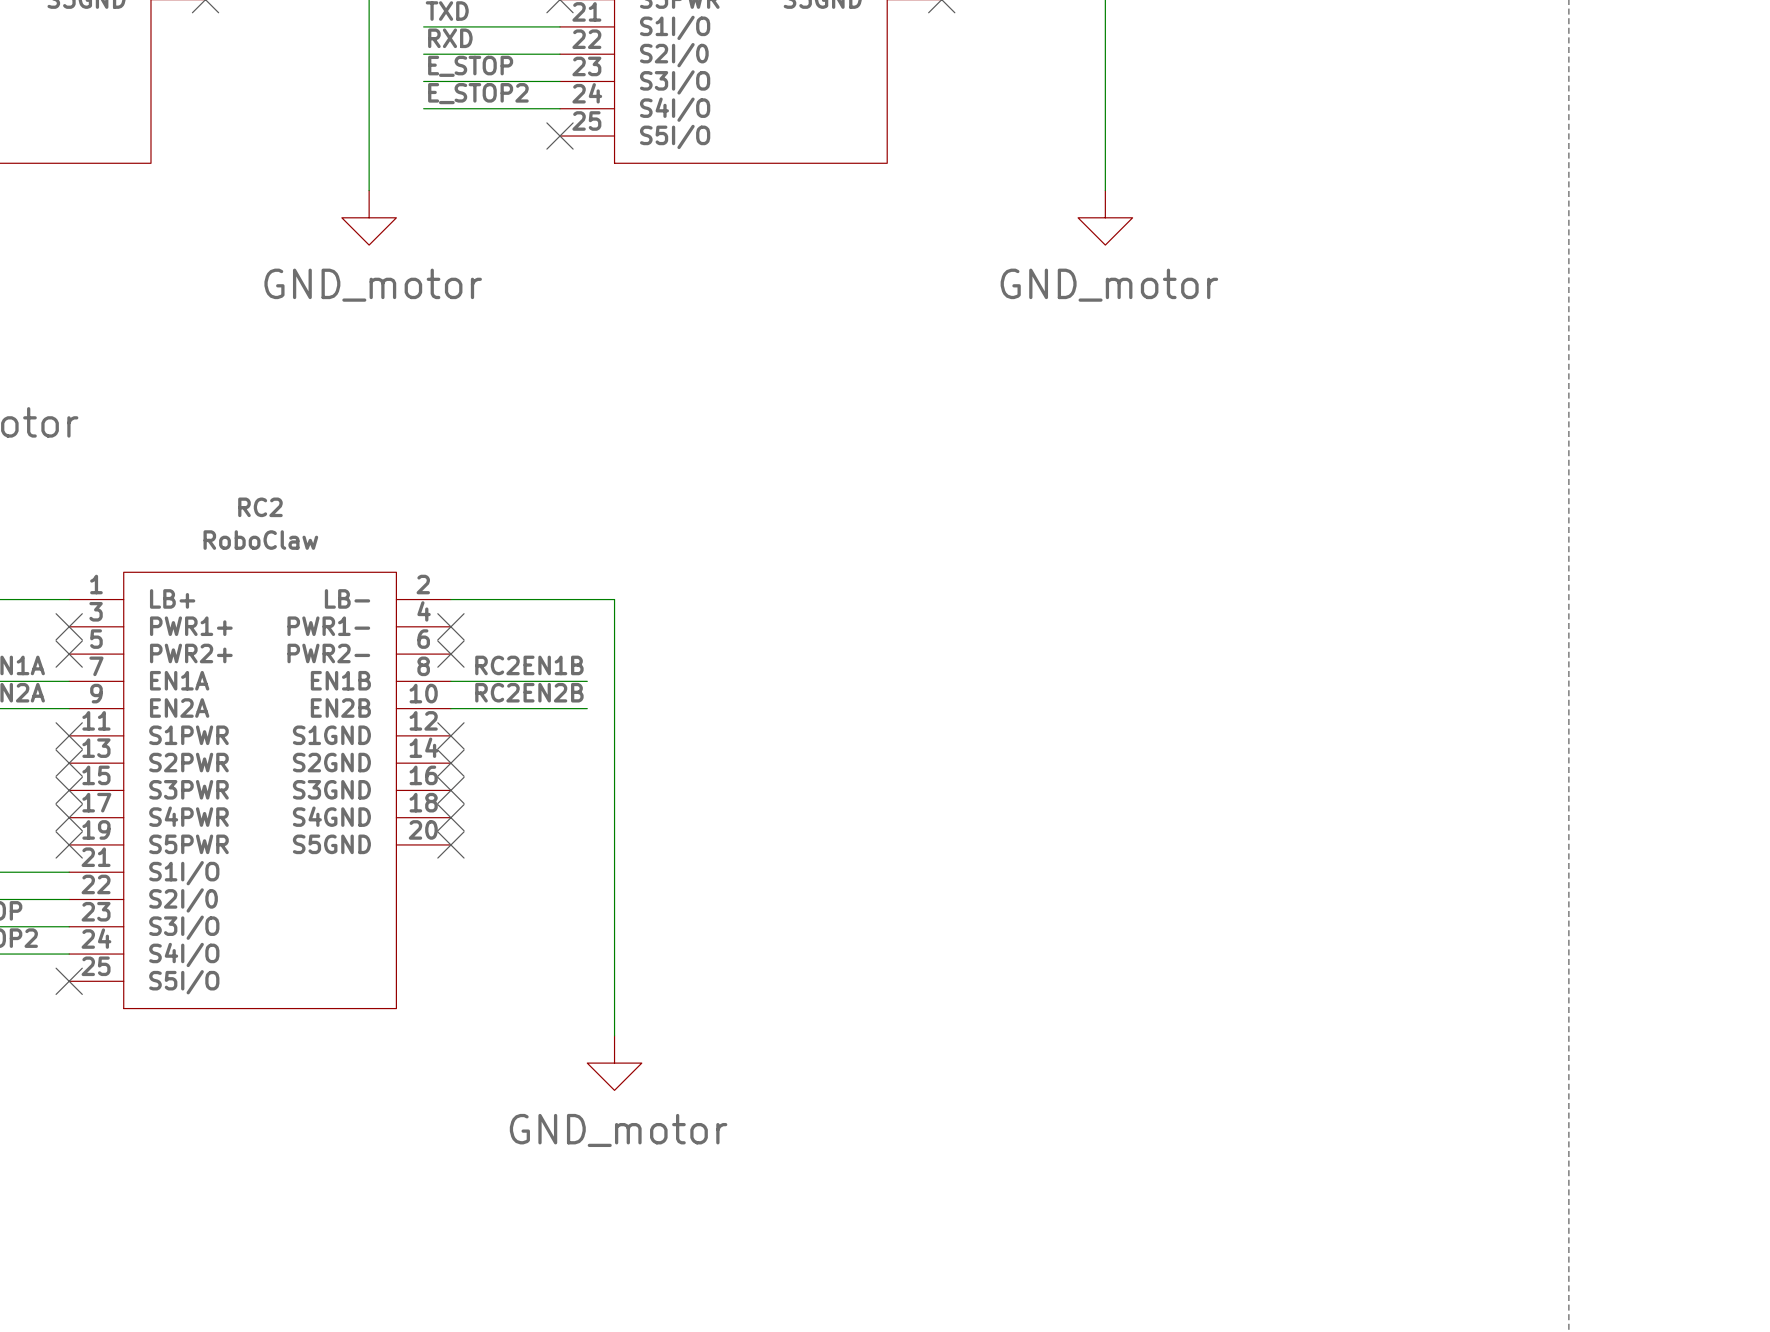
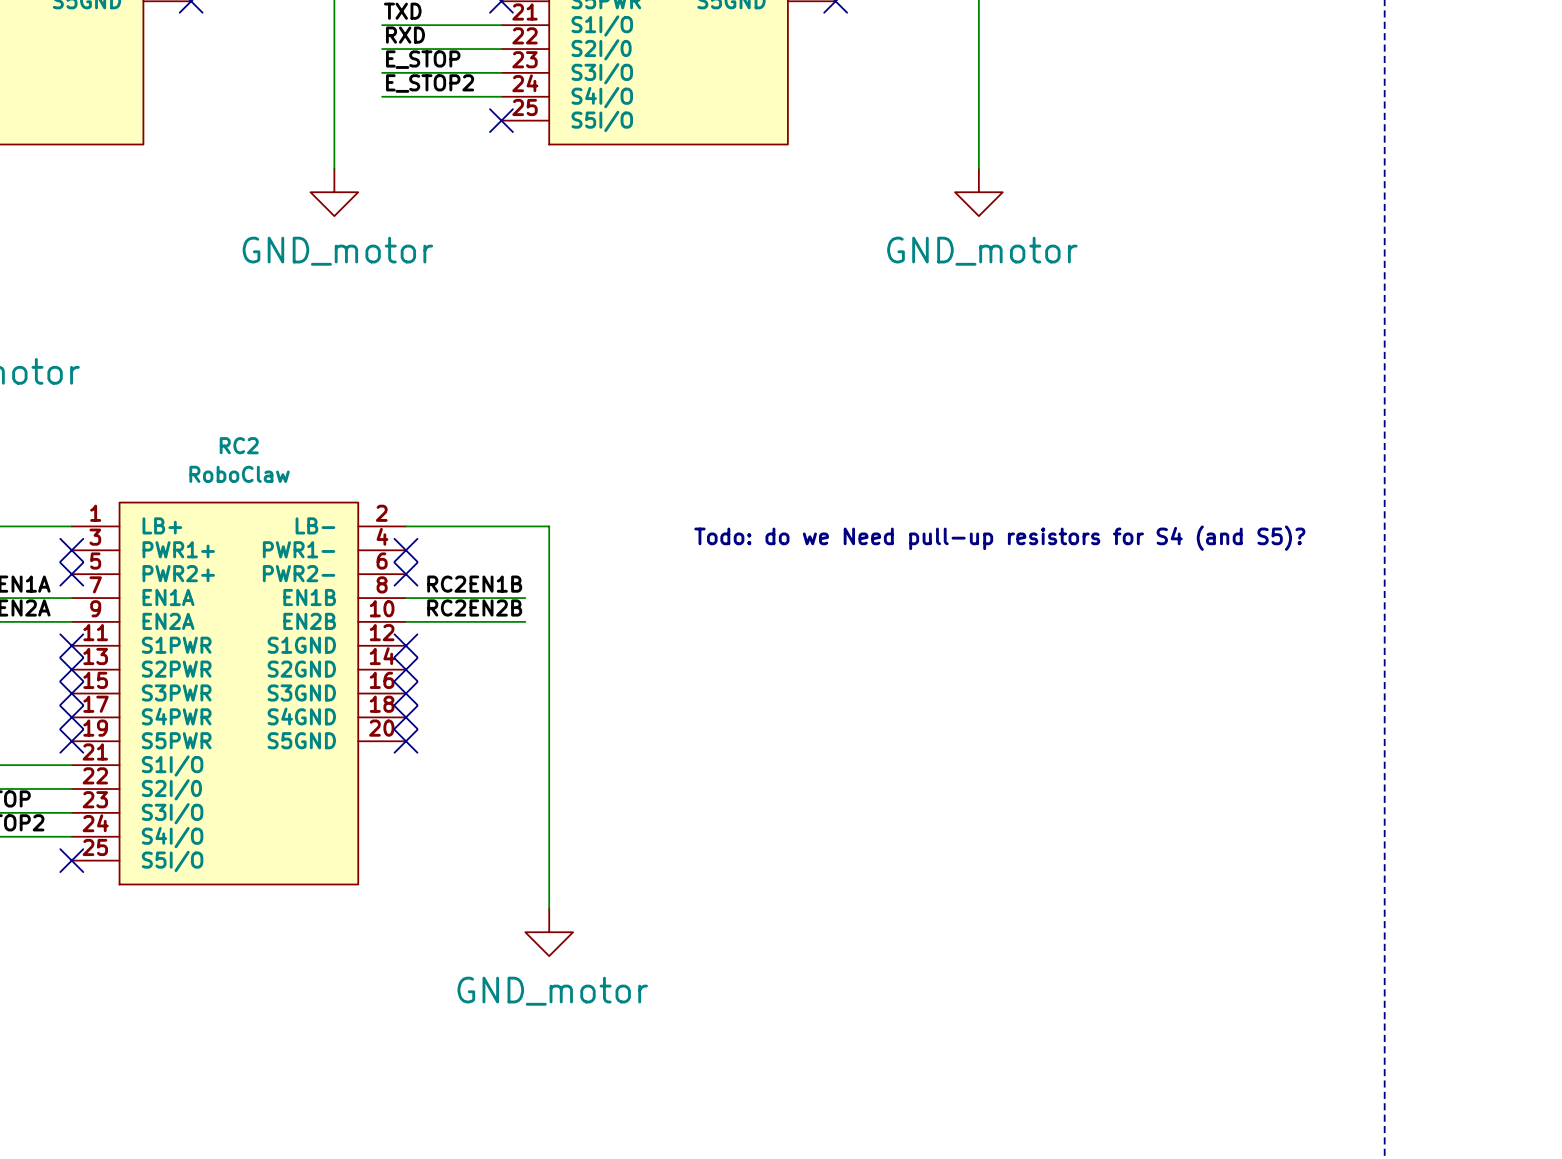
text: none -> Todo: do we Need pull-up resistors for S4 (and S5)? (999, 538)

